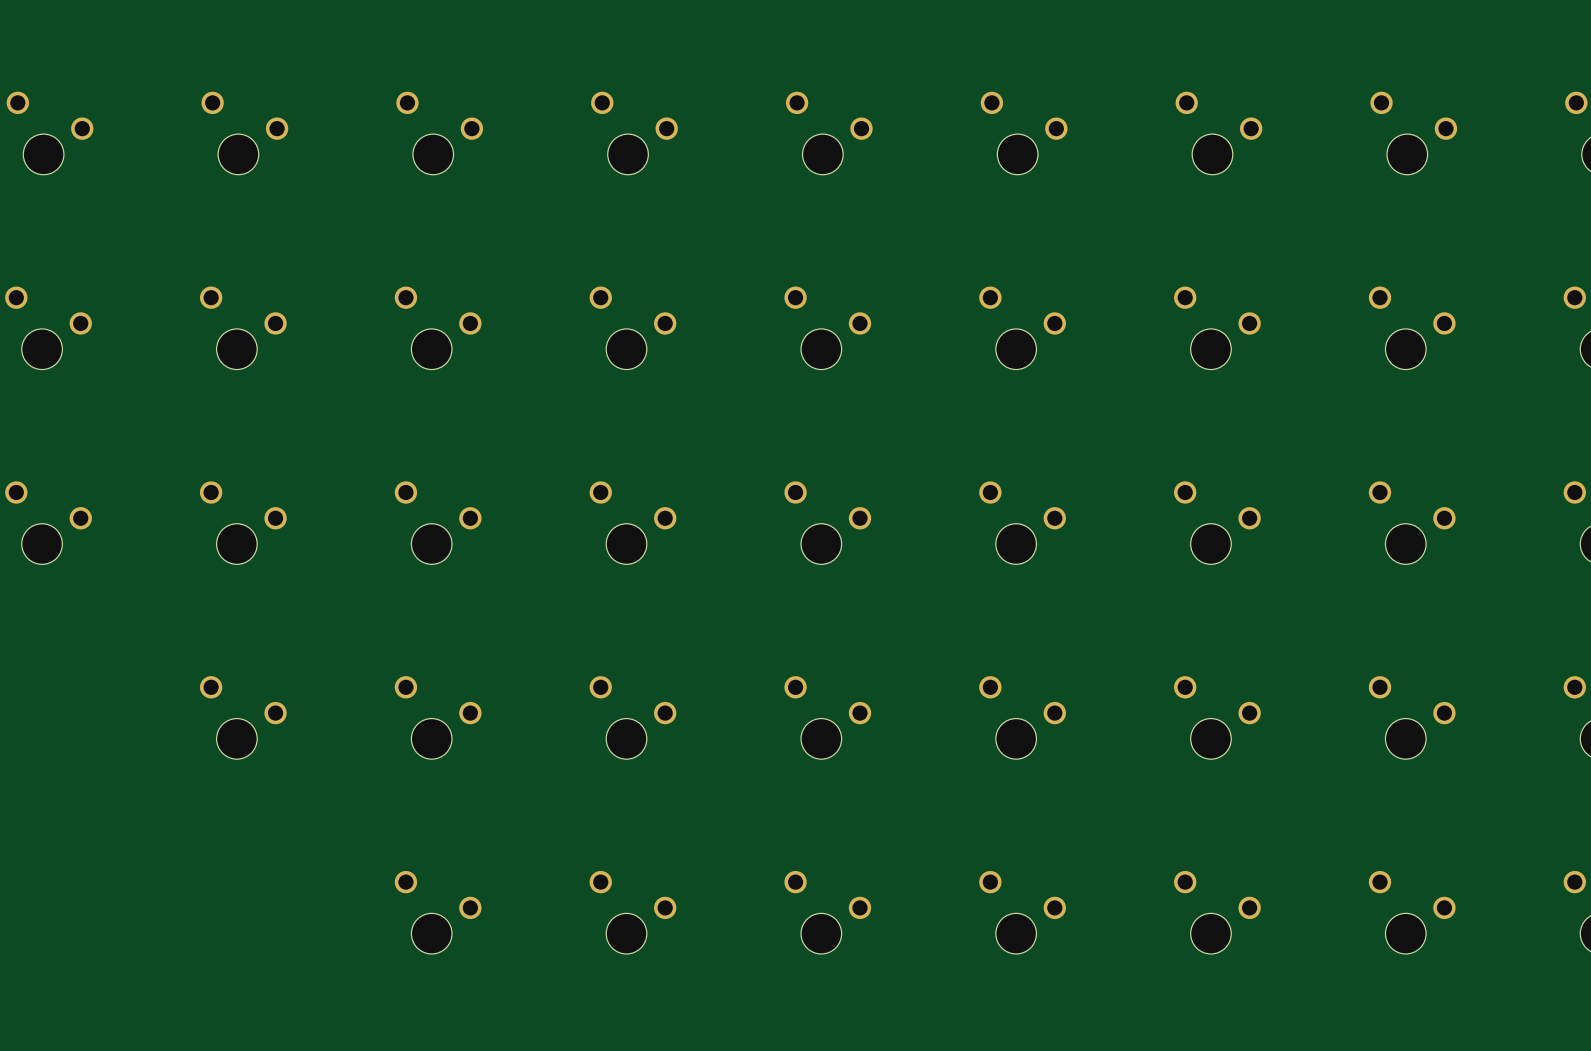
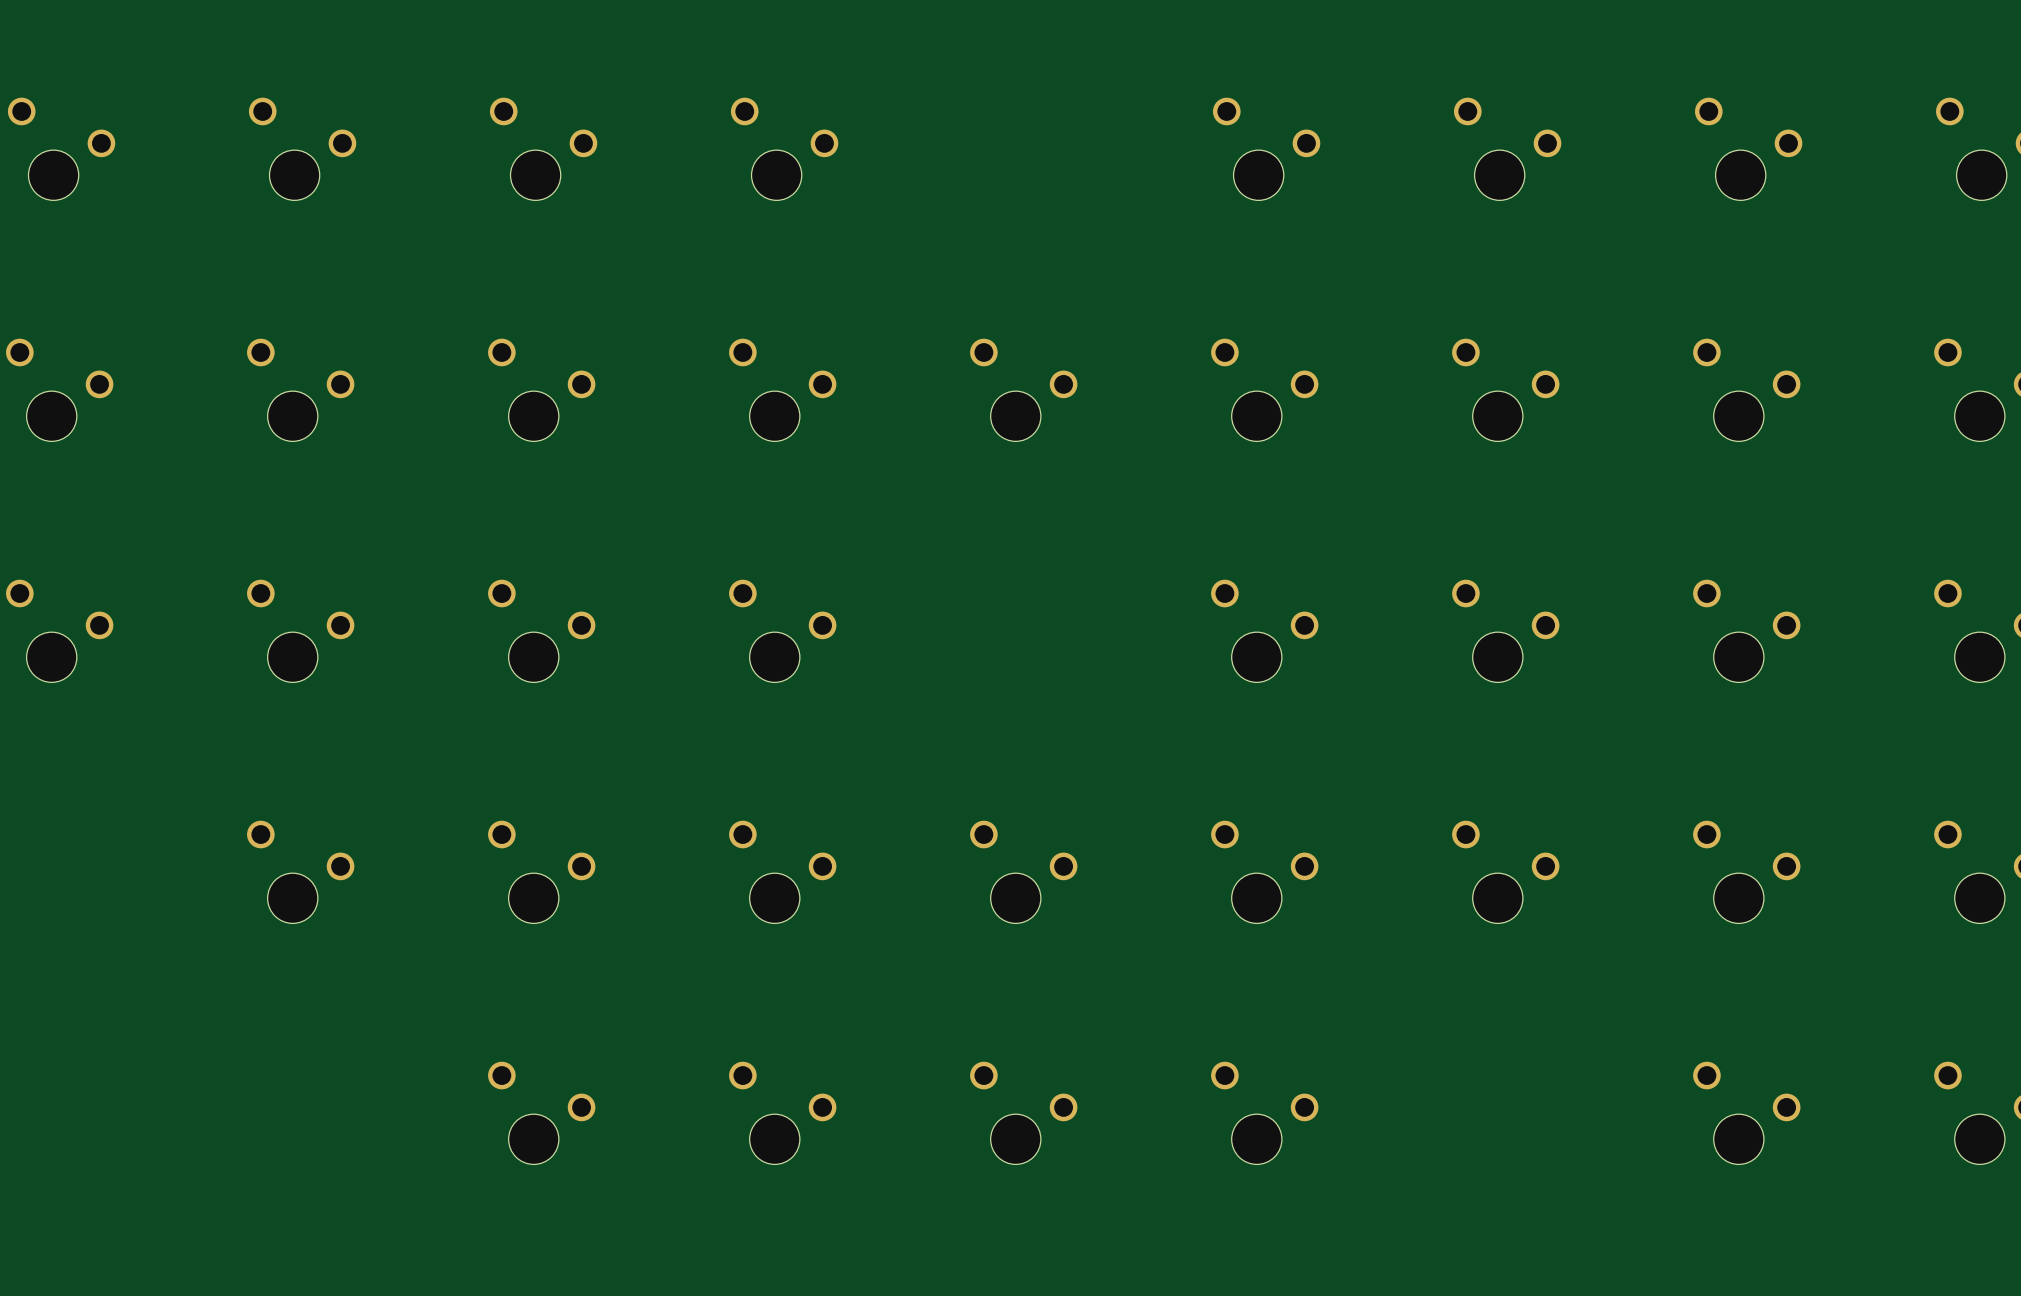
part: (829, 133) -> none
part: (827, 522) -> none
part: (1217, 912) -> none

